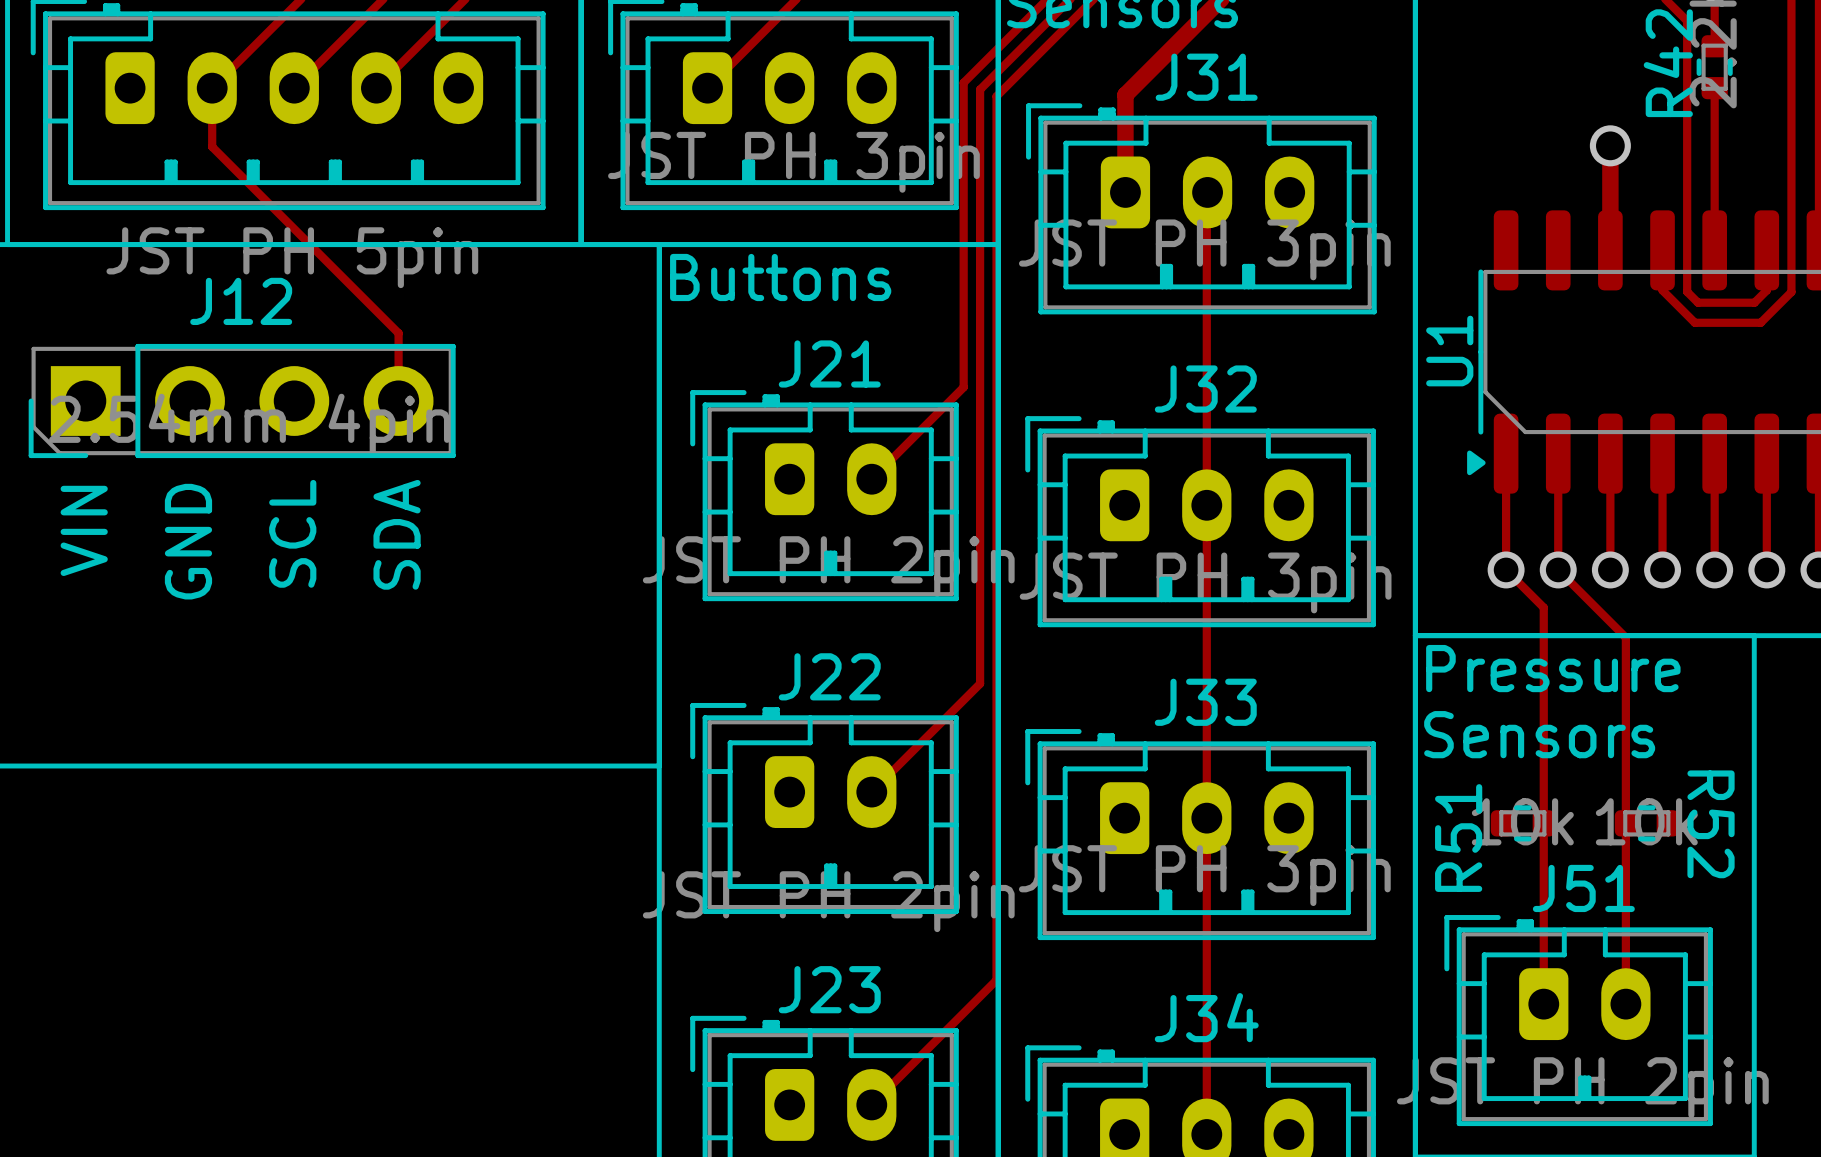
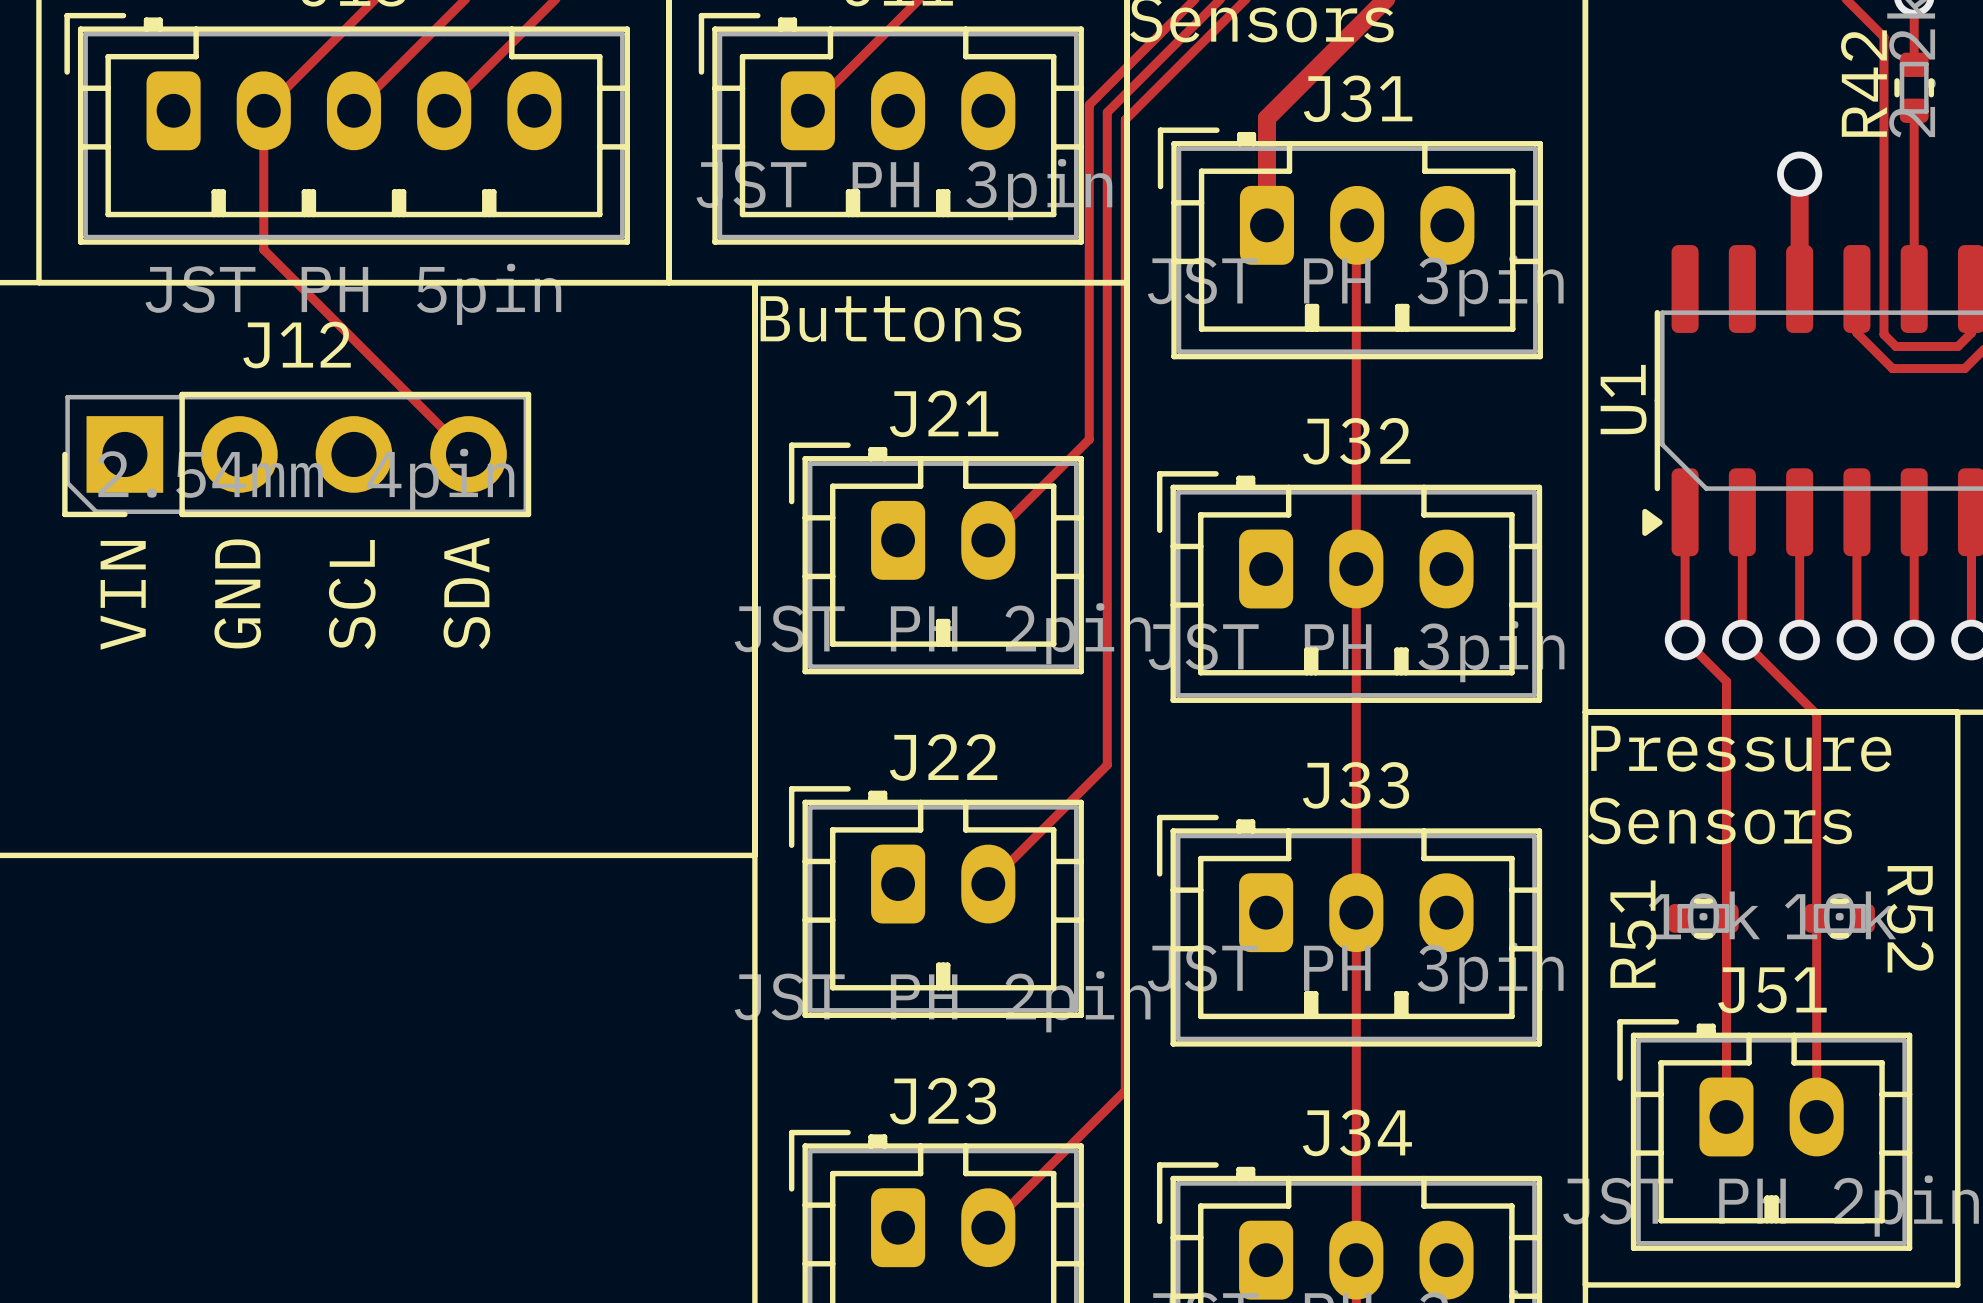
track: (212, 146) (398, 333) (398, 401) -> (263, 175) (263, 249) (468, 454)

